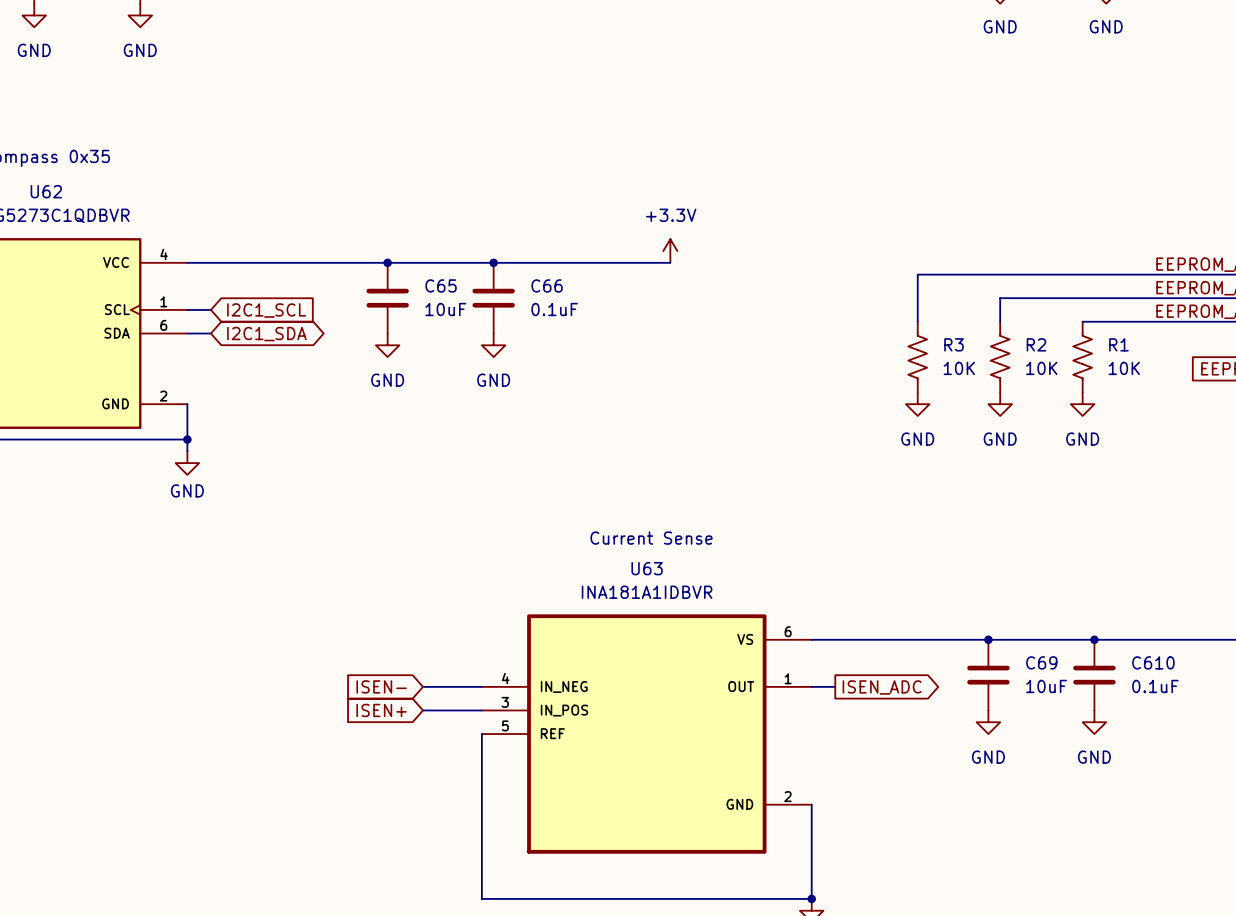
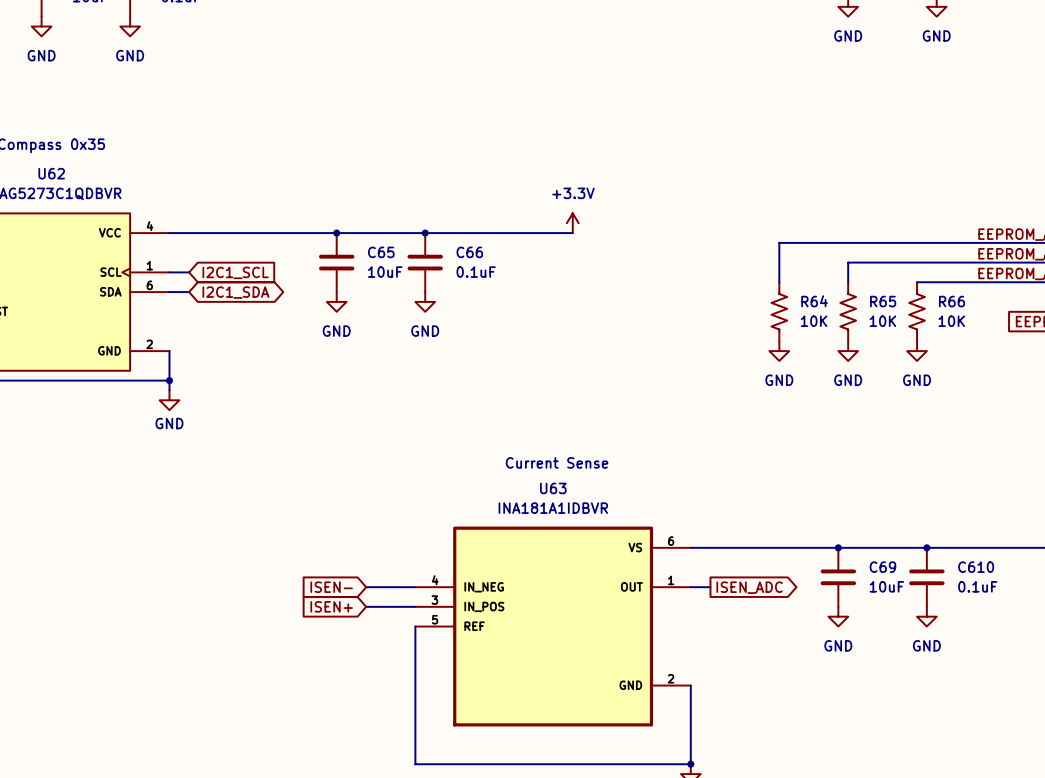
R3 name: R3 (954, 344) -> R64 (814, 301)
R2 name: R2 (1036, 344) -> R65 (883, 301)
R1 name: R1 (1118, 344) -> R66 (952, 301)

